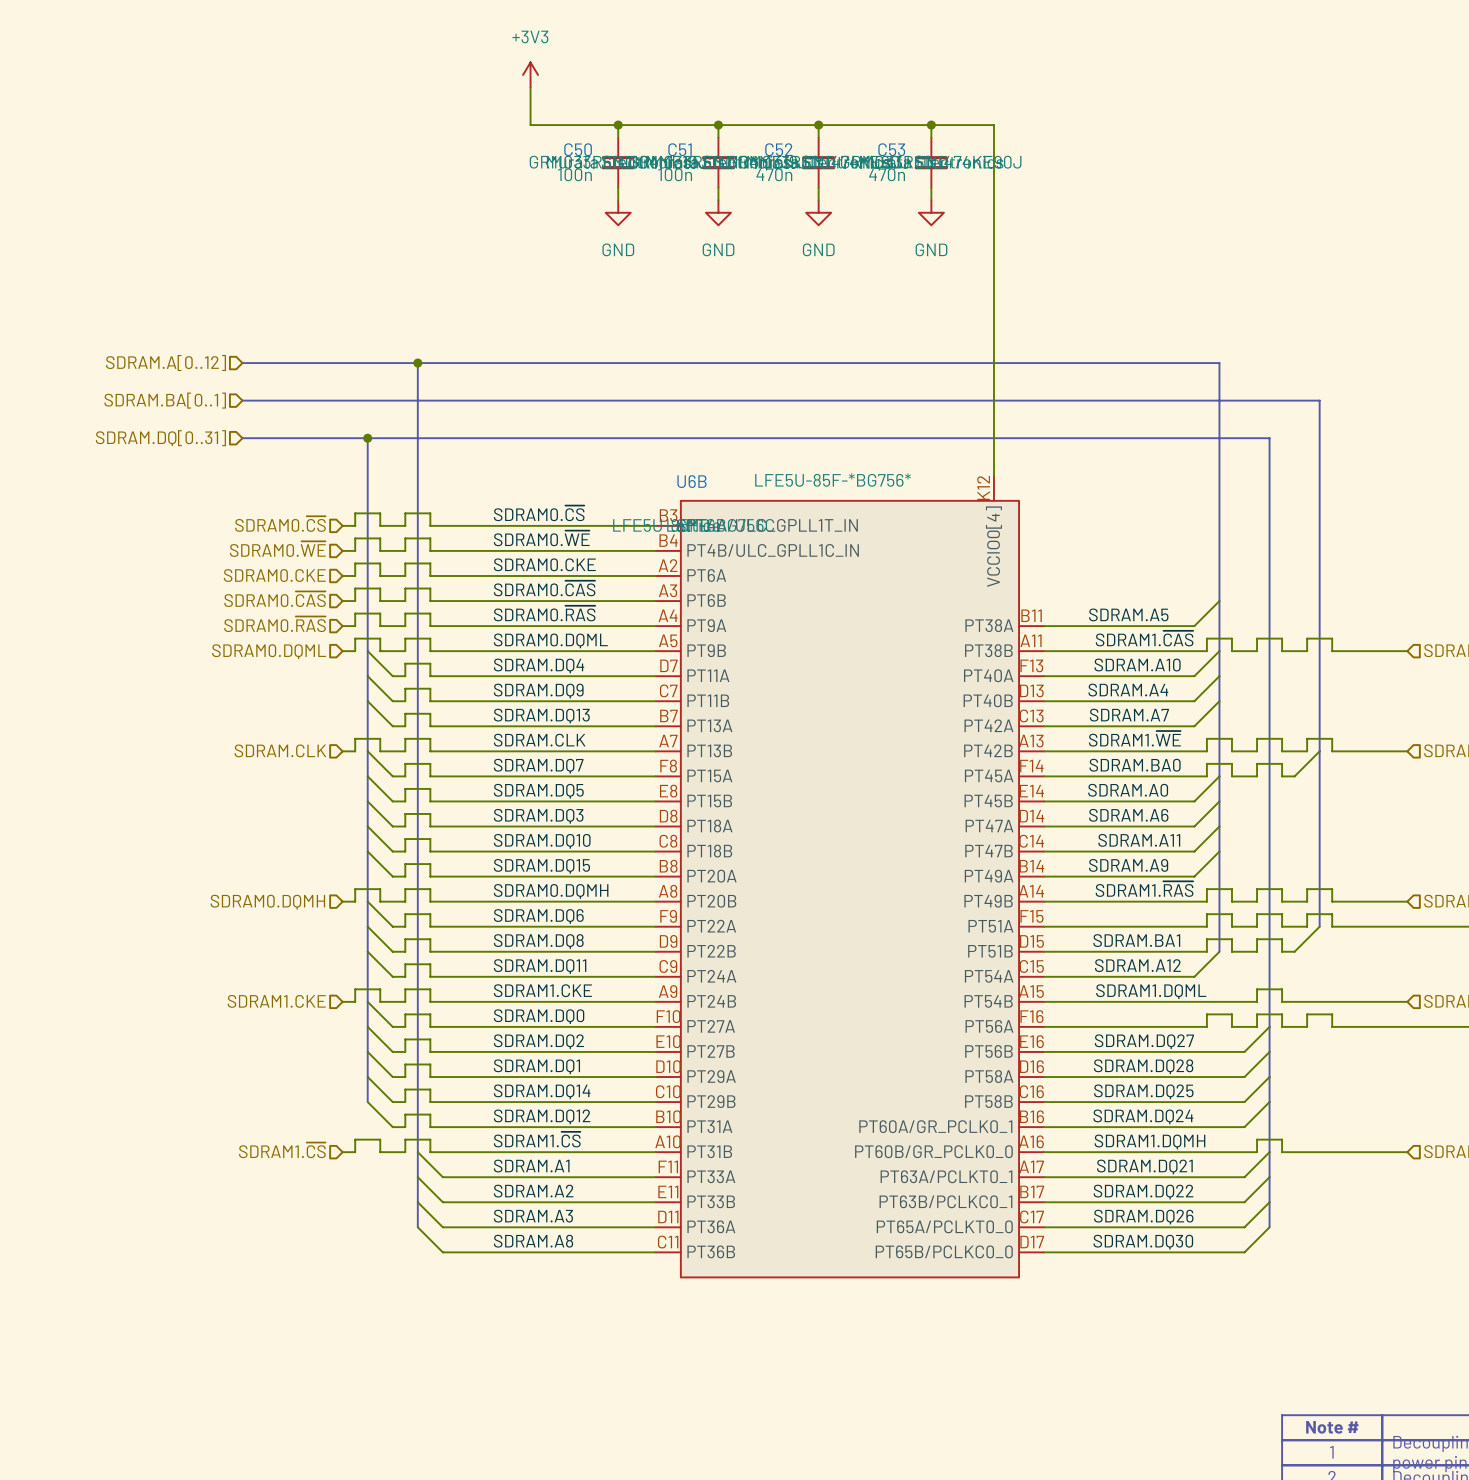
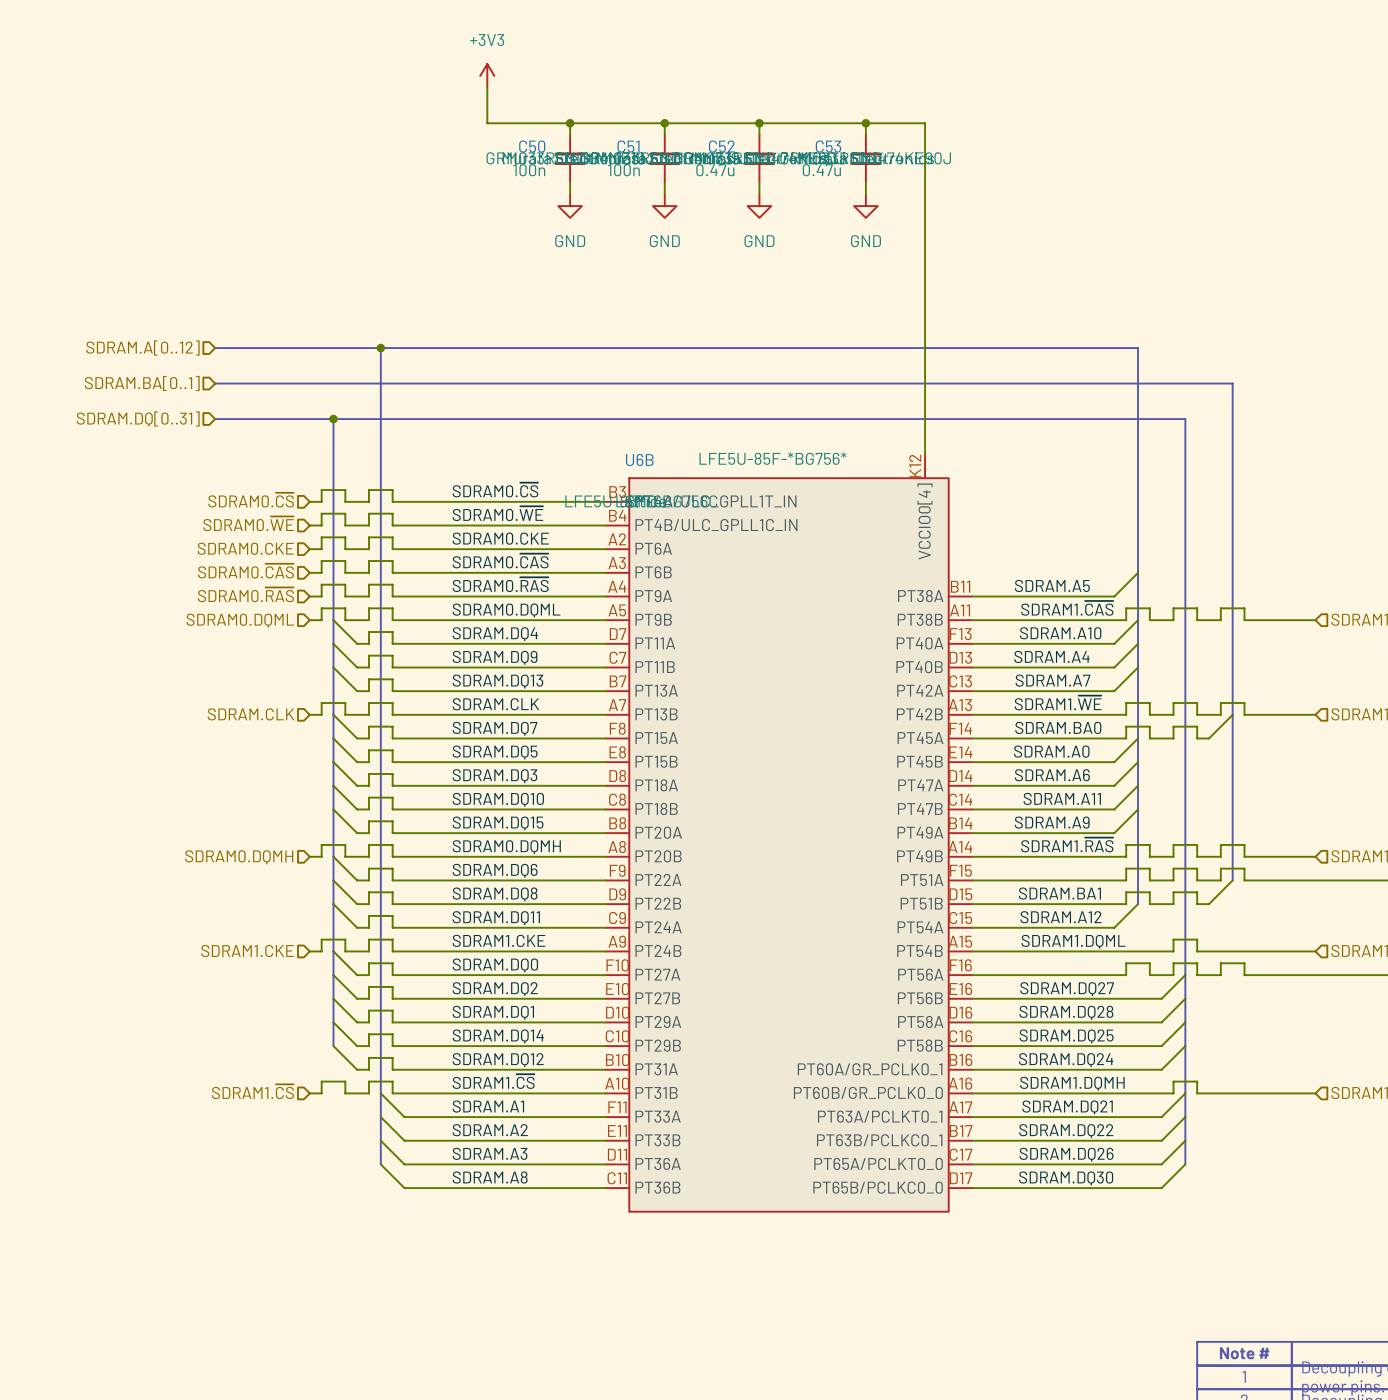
C52 value: 470n (774, 174) -> 0.47u (715, 170)
C53 value: 470n (887, 174) -> 0.47u (821, 170)

